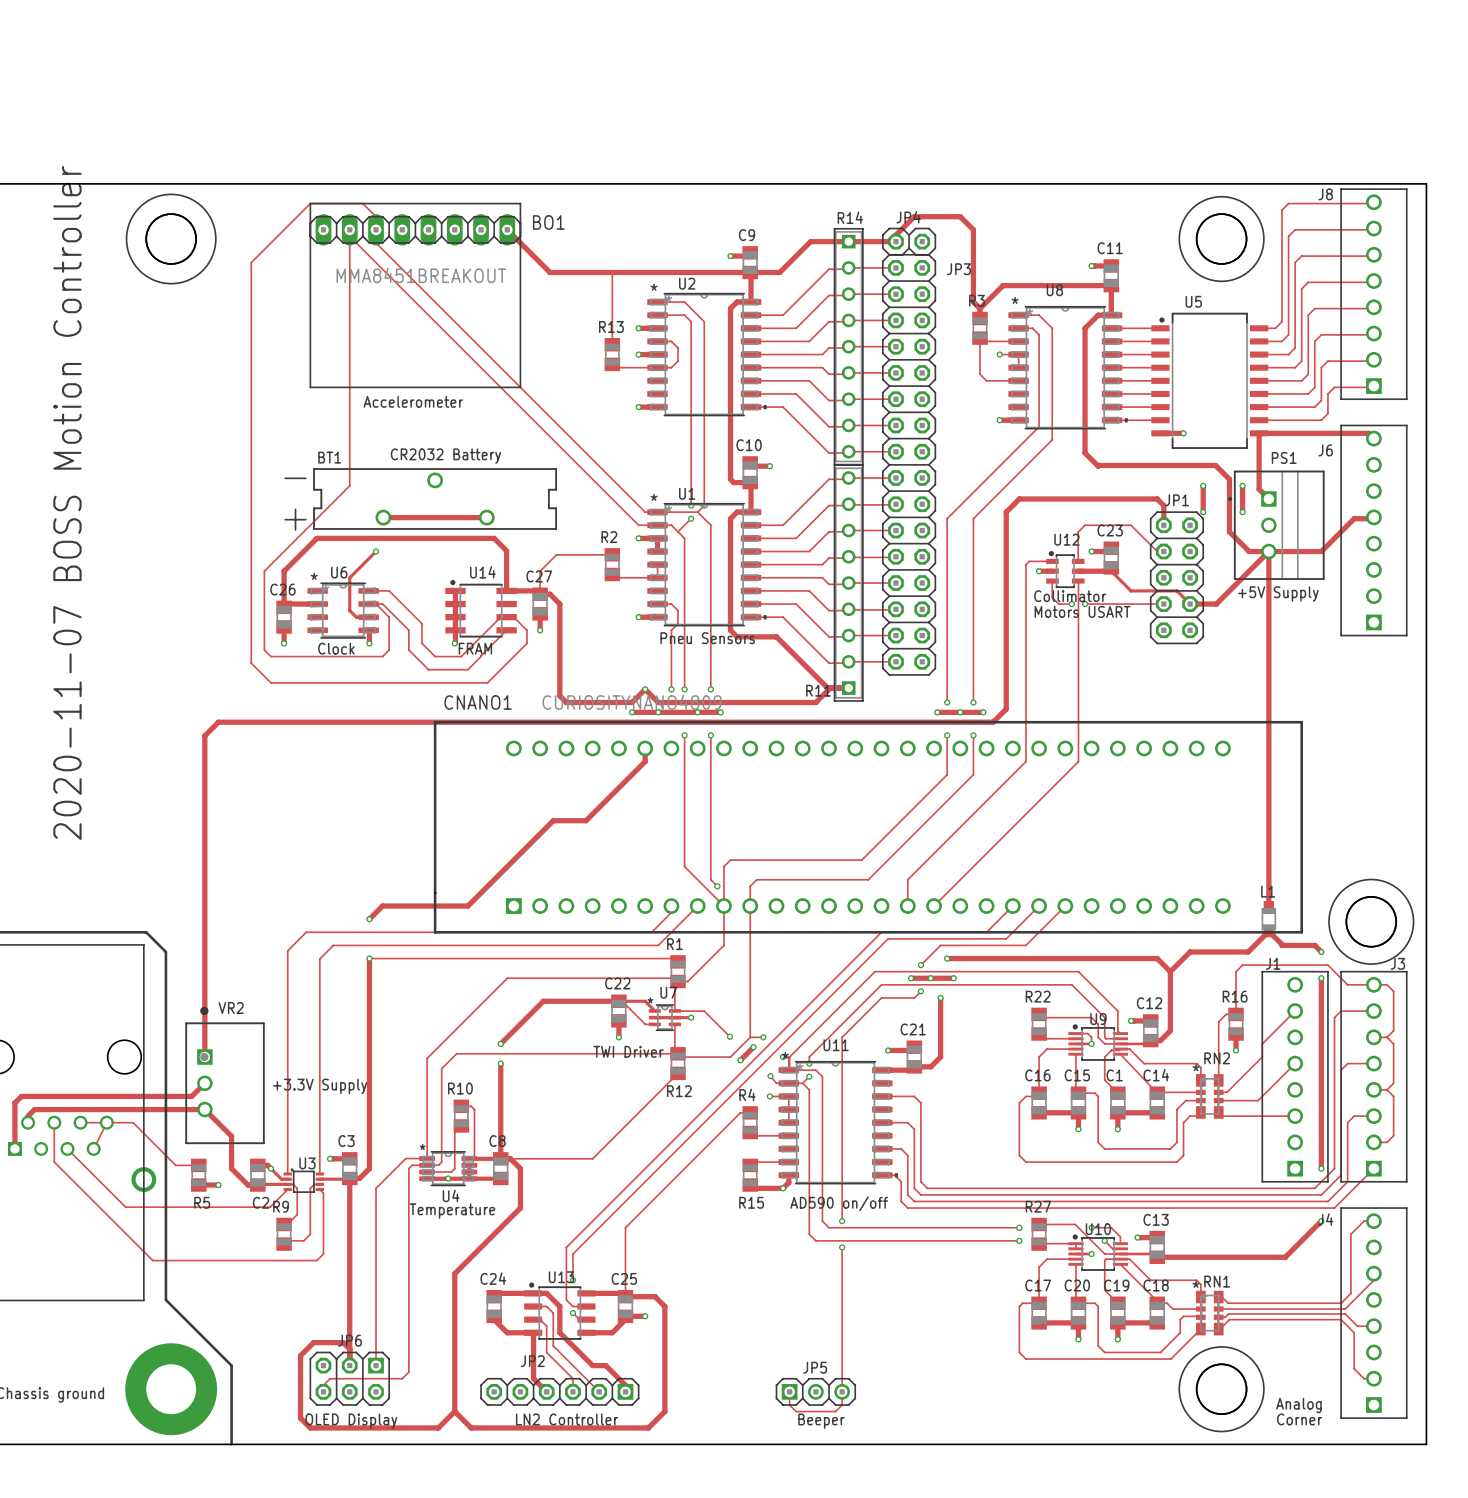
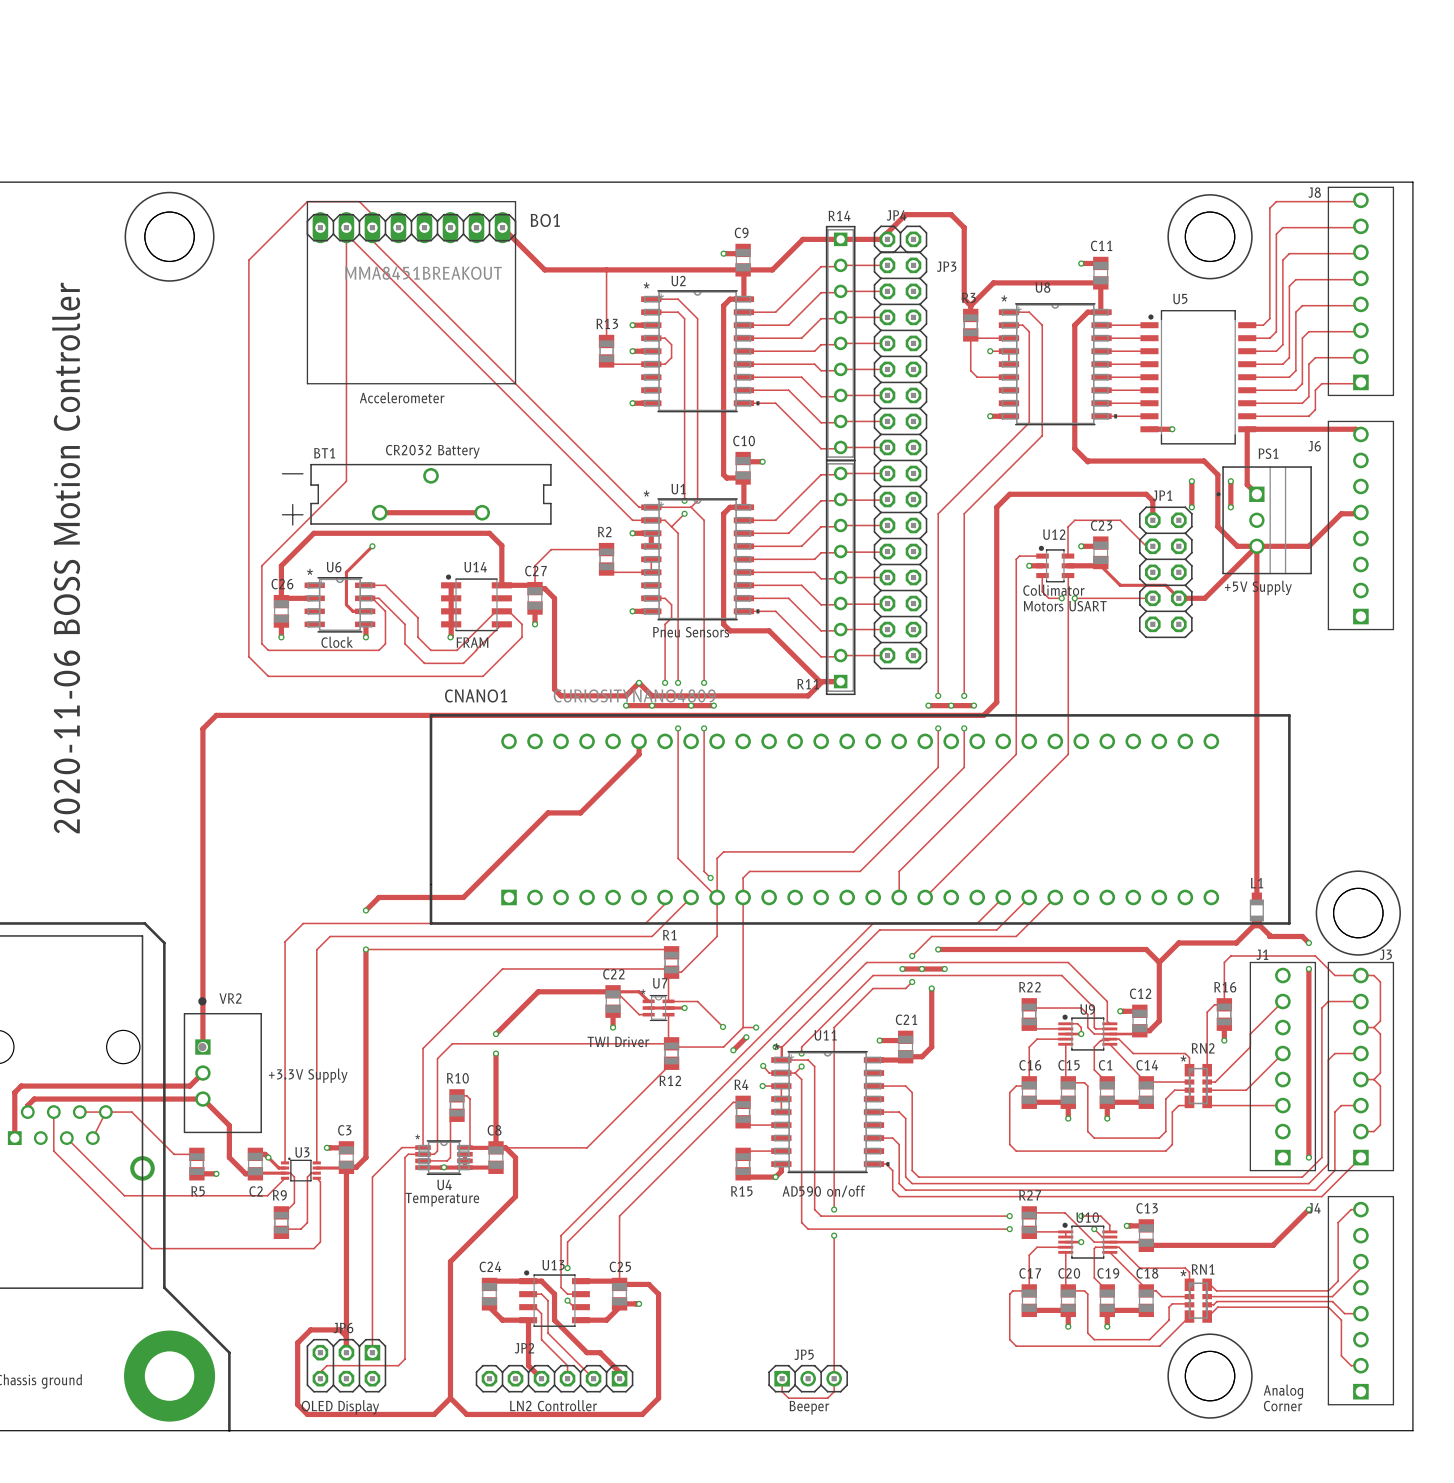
text: 2020-11-07 BOSS Motion Controller (67, 502) -> 2020-11-06 BOSS Motion Controller (66, 558)

